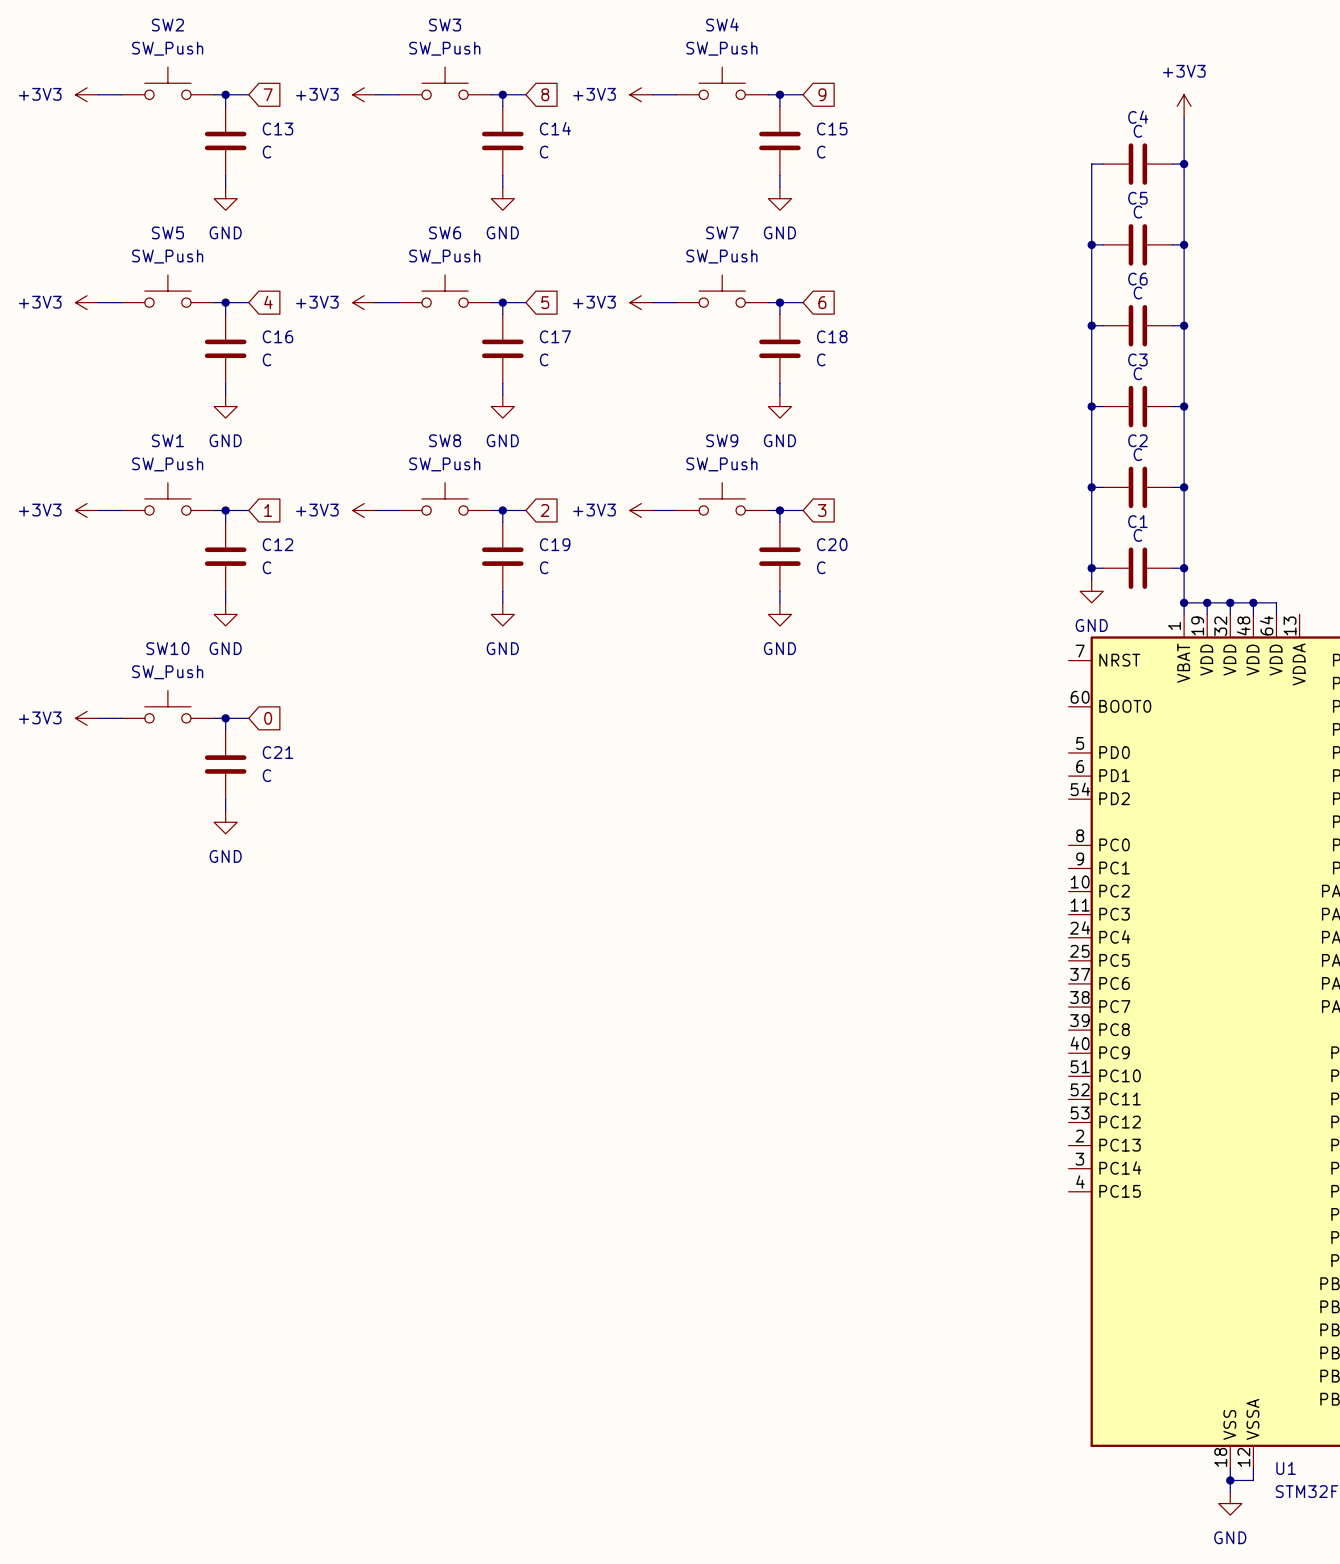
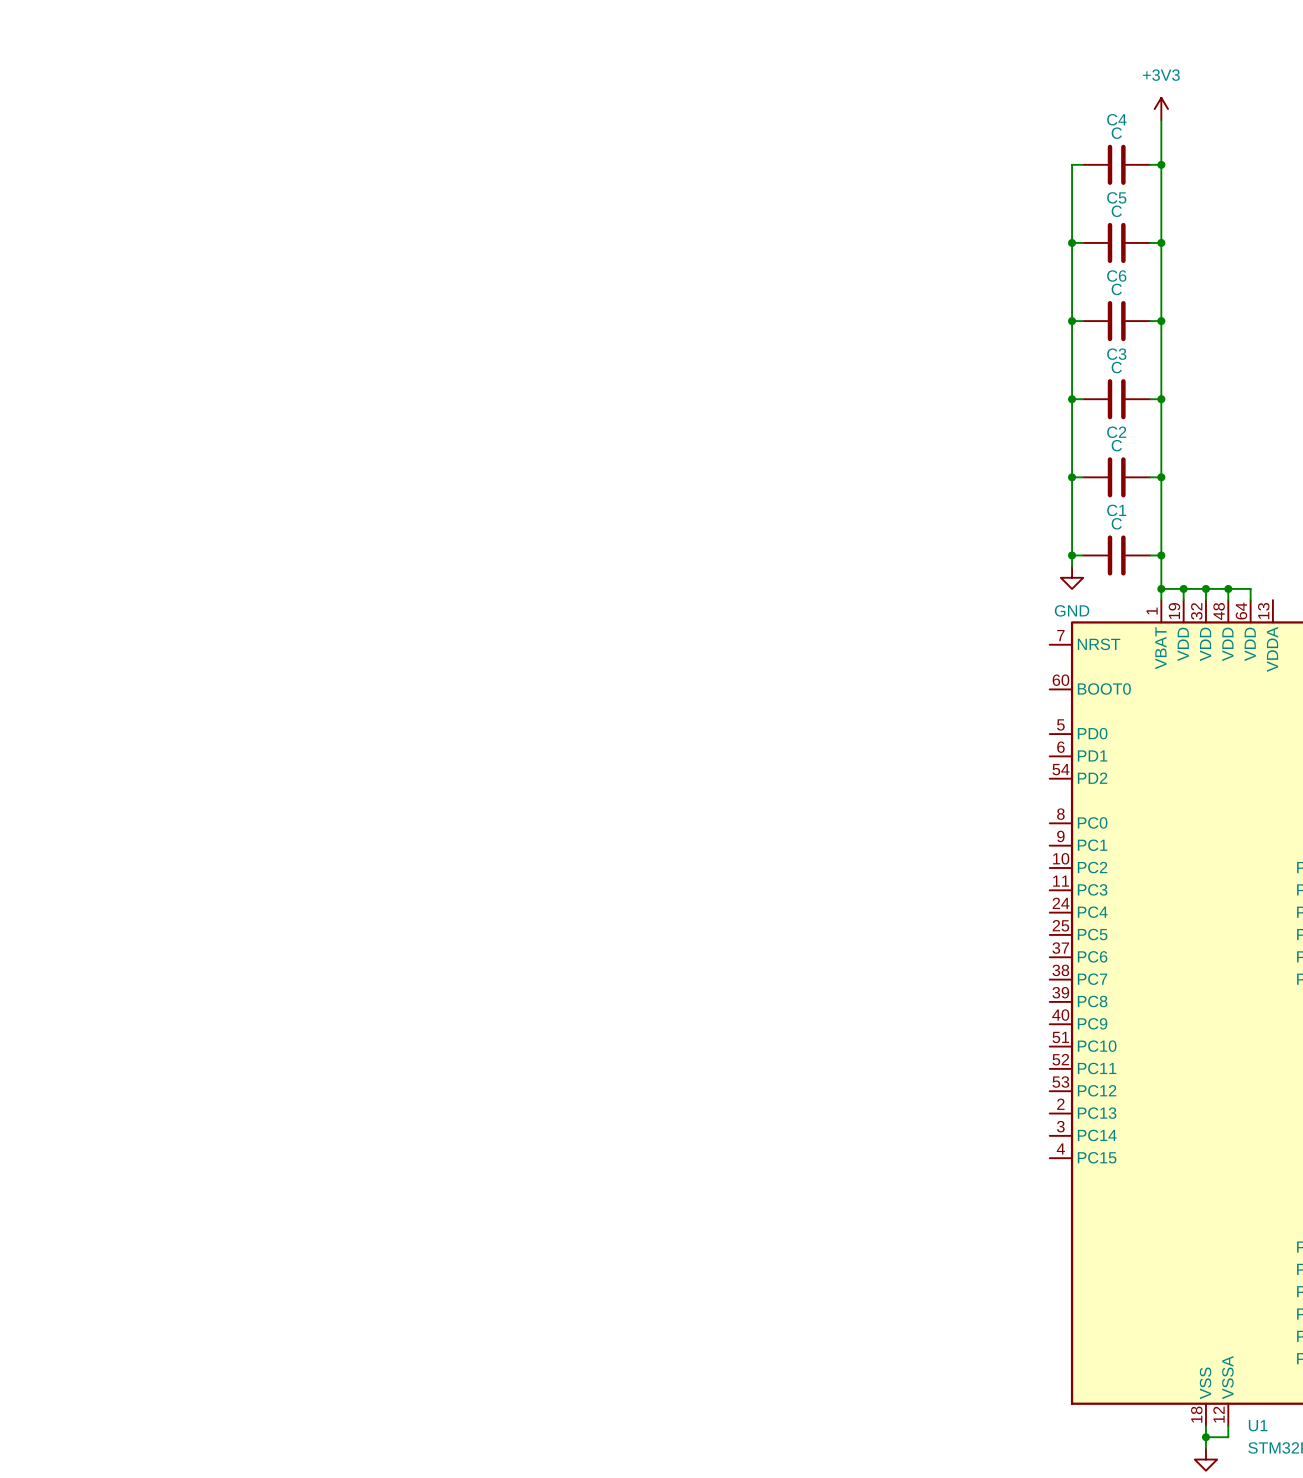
SW2: SW_Push (167, 83) -> none
SW3: SW_Push (445, 83) -> none
SW4: SW_Push (722, 83) -> none
power symbol: +3V3 (87, 94) -> none
wire: (98, 94) (121, 94) -> none
wire: (214, 94) (248, 94) -> none
wire: (225, 94) (225, 106) -> none
junction: (225, 94) -> none
global label: 7 (268, 94) -> none
power symbol: +3V3 (364, 94) -> none
wire: (375, 94) (398, 94) -> none
wire: (491, 94) (525, 94) -> none
wire: (502, 94) (502, 106) -> none
junction: (502, 94) -> none
global label: 8 (545, 94) -> none
power symbol: +3V3 (641, 94) -> none
wire: (652, 94) (676, 94) -> none
wire: (768, 94) (803, 94) -> none
wire: (779, 94) (779, 106) -> none
junction: (779, 94) -> none
global label: 9 (822, 94) -> none
C13: C (225, 140) -> none
C14: C (502, 140) -> none
C15: C (779, 140) -> none
wire: (225, 175) (225, 187) -> none
wire: (502, 175) (502, 187) -> none
wire: (779, 175) (779, 187) -> none
power symbol: GND (225, 198) -> none
power symbol: GND (502, 198) -> none
power symbol: GND (779, 198) -> none
SW5: SW_Push (167, 291) -> none
SW6: SW_Push (445, 291) -> none
SW7: SW_Push (722, 291) -> none
power symbol: +3V3 (87, 302) -> none
wire: (98, 302) (121, 302) -> none
wire: (214, 302) (248, 302) -> none
wire: (225, 302) (225, 314) -> none
junction: (225, 302) -> none
global label: 4 (268, 302) -> none
power symbol: +3V3 (364, 302) -> none
wire: (375, 302) (398, 302) -> none
wire: (491, 302) (525, 302) -> none
wire: (502, 302) (502, 314) -> none
junction: (502, 302) -> none
global label: 5 (545, 302) -> none
power symbol: +3V3 (641, 302) -> none
wire: (652, 302) (676, 302) -> none
wire: (768, 302) (803, 302) -> none
wire: (779, 302) (779, 314) -> none
junction: (779, 302) -> none
global label: 6 (822, 302) -> none
C16: C (225, 348) -> none
C17: C (502, 348) -> none
C18: C (779, 348) -> none
wire: (225, 383) (225, 395) -> none
wire: (502, 383) (502, 395) -> none
wire: (779, 383) (779, 395) -> none
power symbol: GND (225, 406) -> none
power symbol: GND (502, 406) -> none
power symbol: GND (779, 406) -> none
SW1: SW_Push (167, 498) -> none
SW8: SW_Push (445, 498) -> none
SW9: SW_Push (722, 498) -> none
power symbol: +3V3 (87, 510) -> none
wire: (98, 510) (121, 510) -> none
wire: (214, 510) (248, 510) -> none
wire: (225, 510) (225, 522) -> none
junction: (225, 510) -> none
global label: 1 (268, 510) -> none
power symbol: +3V3 (364, 510) -> none
wire: (375, 510) (398, 510) -> none
wire: (491, 510) (525, 510) -> none
wire: (502, 510) (502, 522) -> none
junction: (502, 510) -> none
global label: 2 (545, 510) -> none
power symbol: +3V3 (641, 510) -> none
wire: (652, 510) (676, 510) -> none
wire: (768, 510) (803, 510) -> none
wire: (779, 510) (779, 522) -> none
junction: (779, 510) -> none
global label: 3 (822, 510) -> none
C12: C (225, 556) -> none
C19: C (502, 556) -> none
C20: C (779, 556) -> none
wire: (225, 591) (225, 602) -> none
wire: (502, 591) (502, 602) -> none
wire: (779, 591) (779, 602) -> none
power symbol: GND (225, 614) -> none
power symbol: GND (502, 614) -> none
power symbol: GND (779, 614) -> none
SW10: SW_Push (167, 706) -> none
power symbol: +3V3 (87, 718) -> none
wire: (98, 718) (121, 718) -> none
wire: (214, 718) (248, 718) -> none
wire: (225, 718) (225, 729) -> none
junction: (225, 718) -> none
global label: 0 (268, 718) -> none
C21: C (225, 764) -> none
wire: (225, 799) (225, 810) -> none
power symbol: GND (225, 822) -> none

